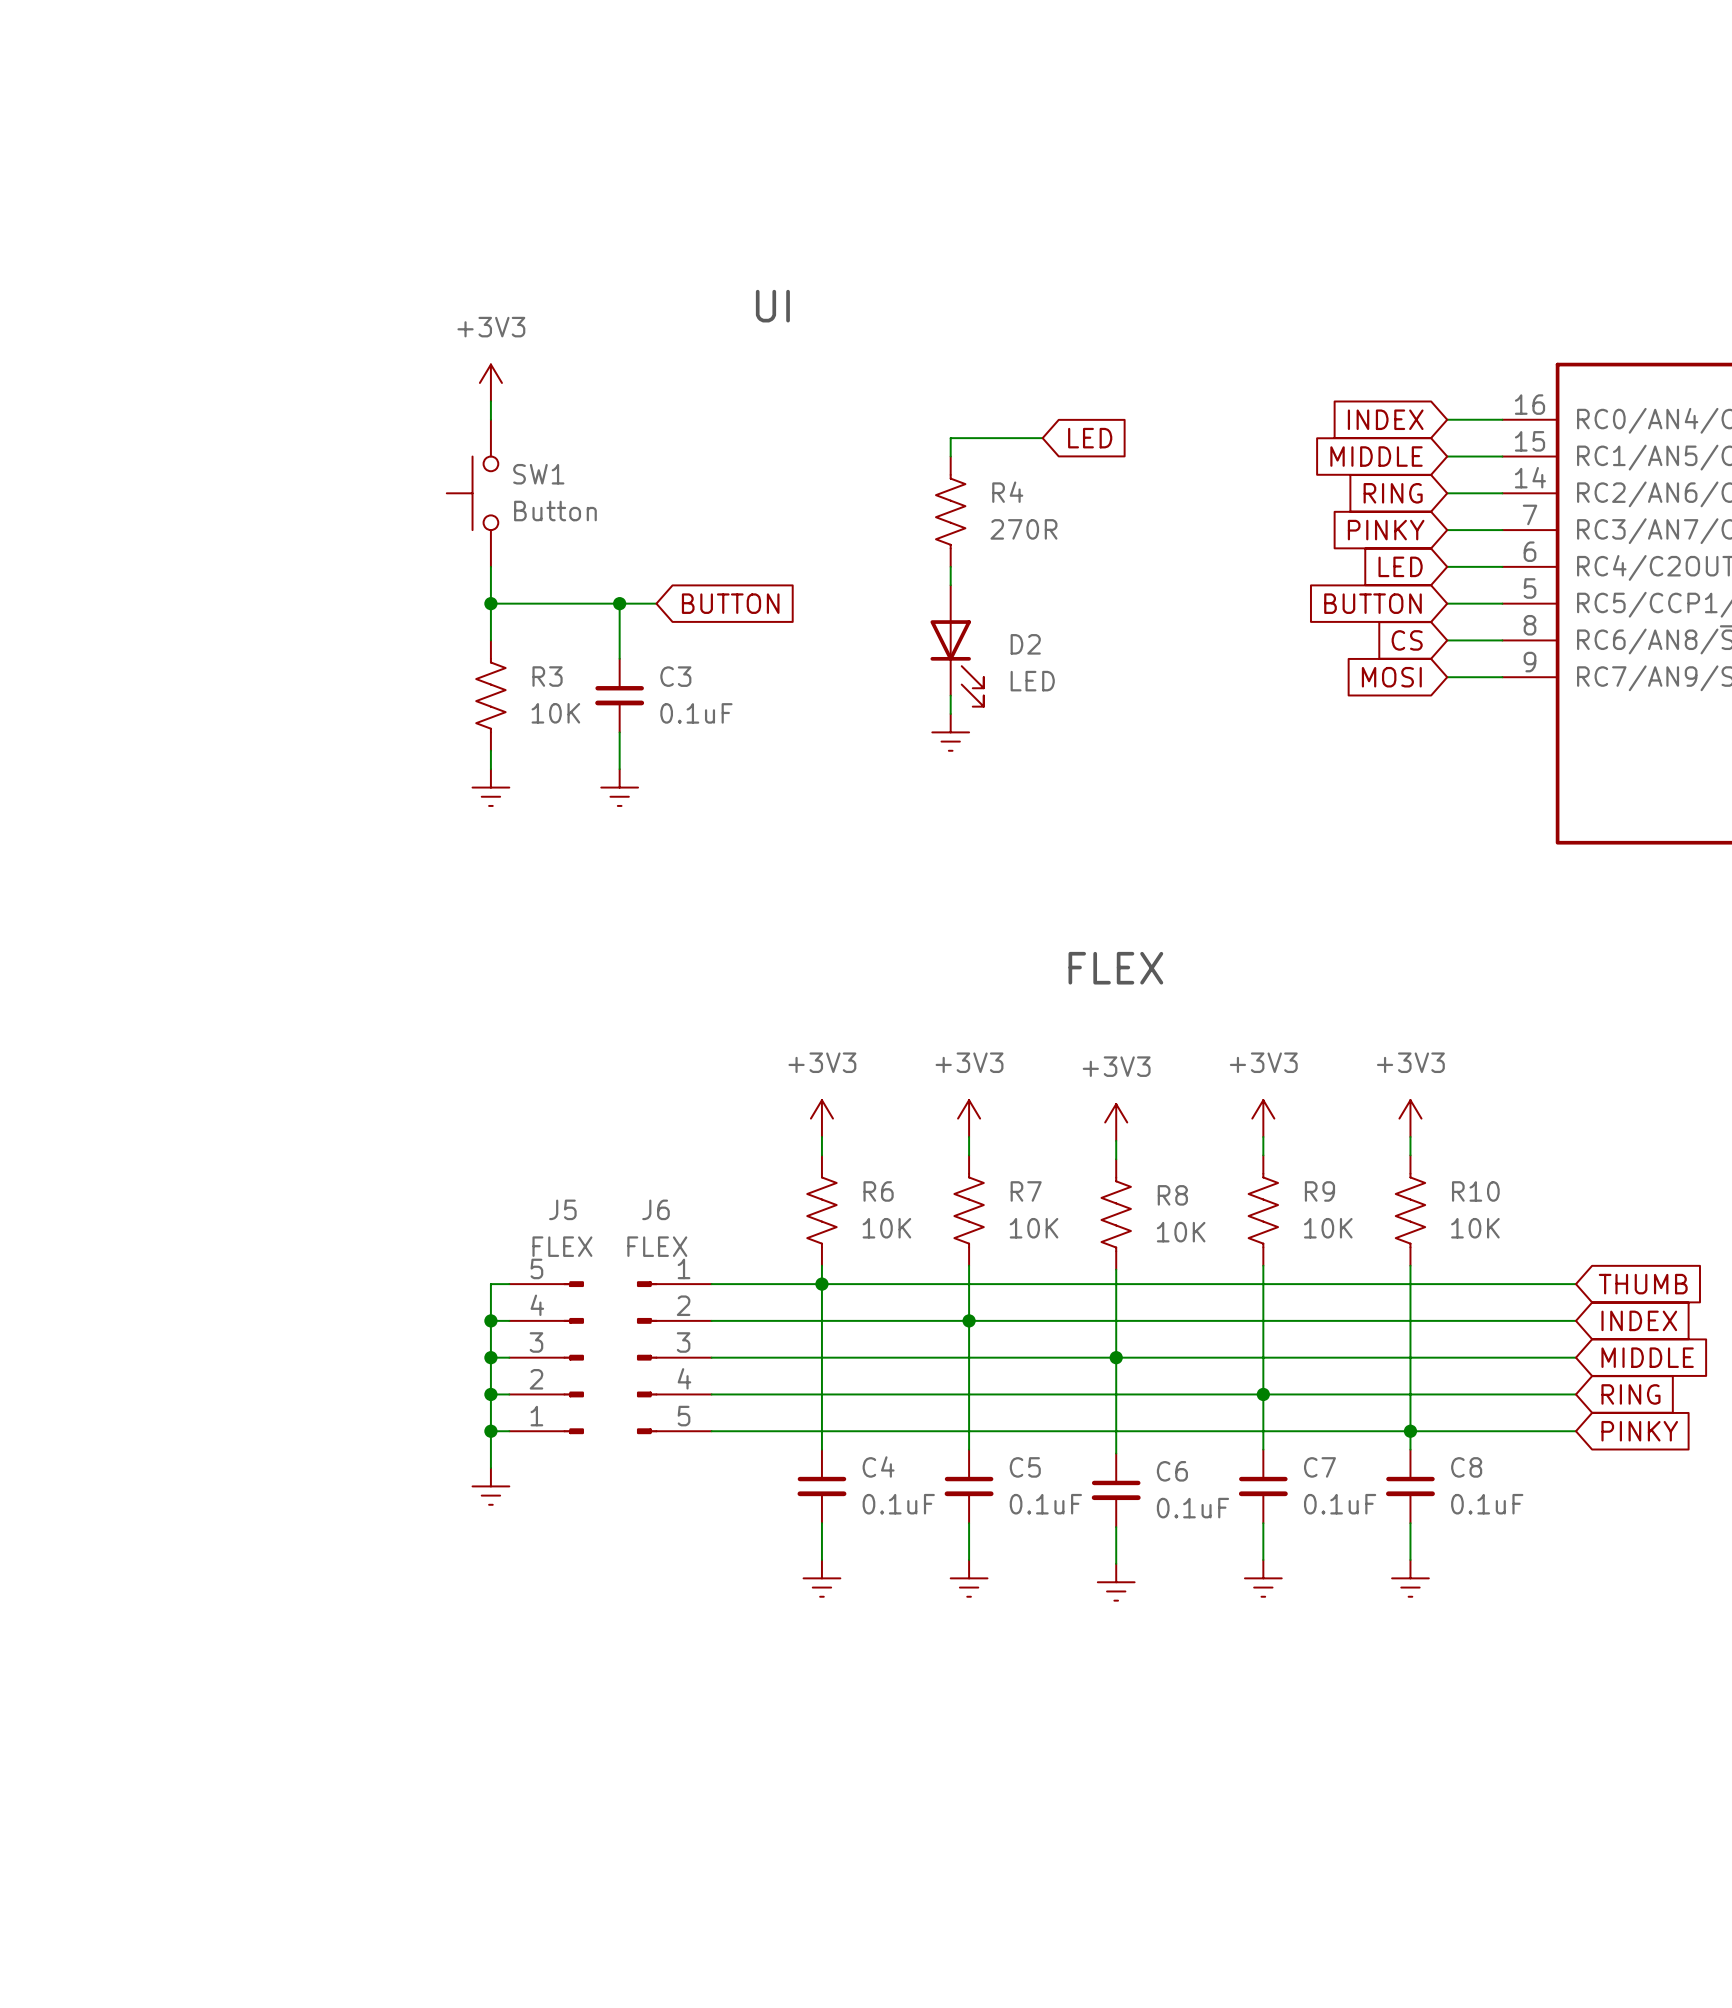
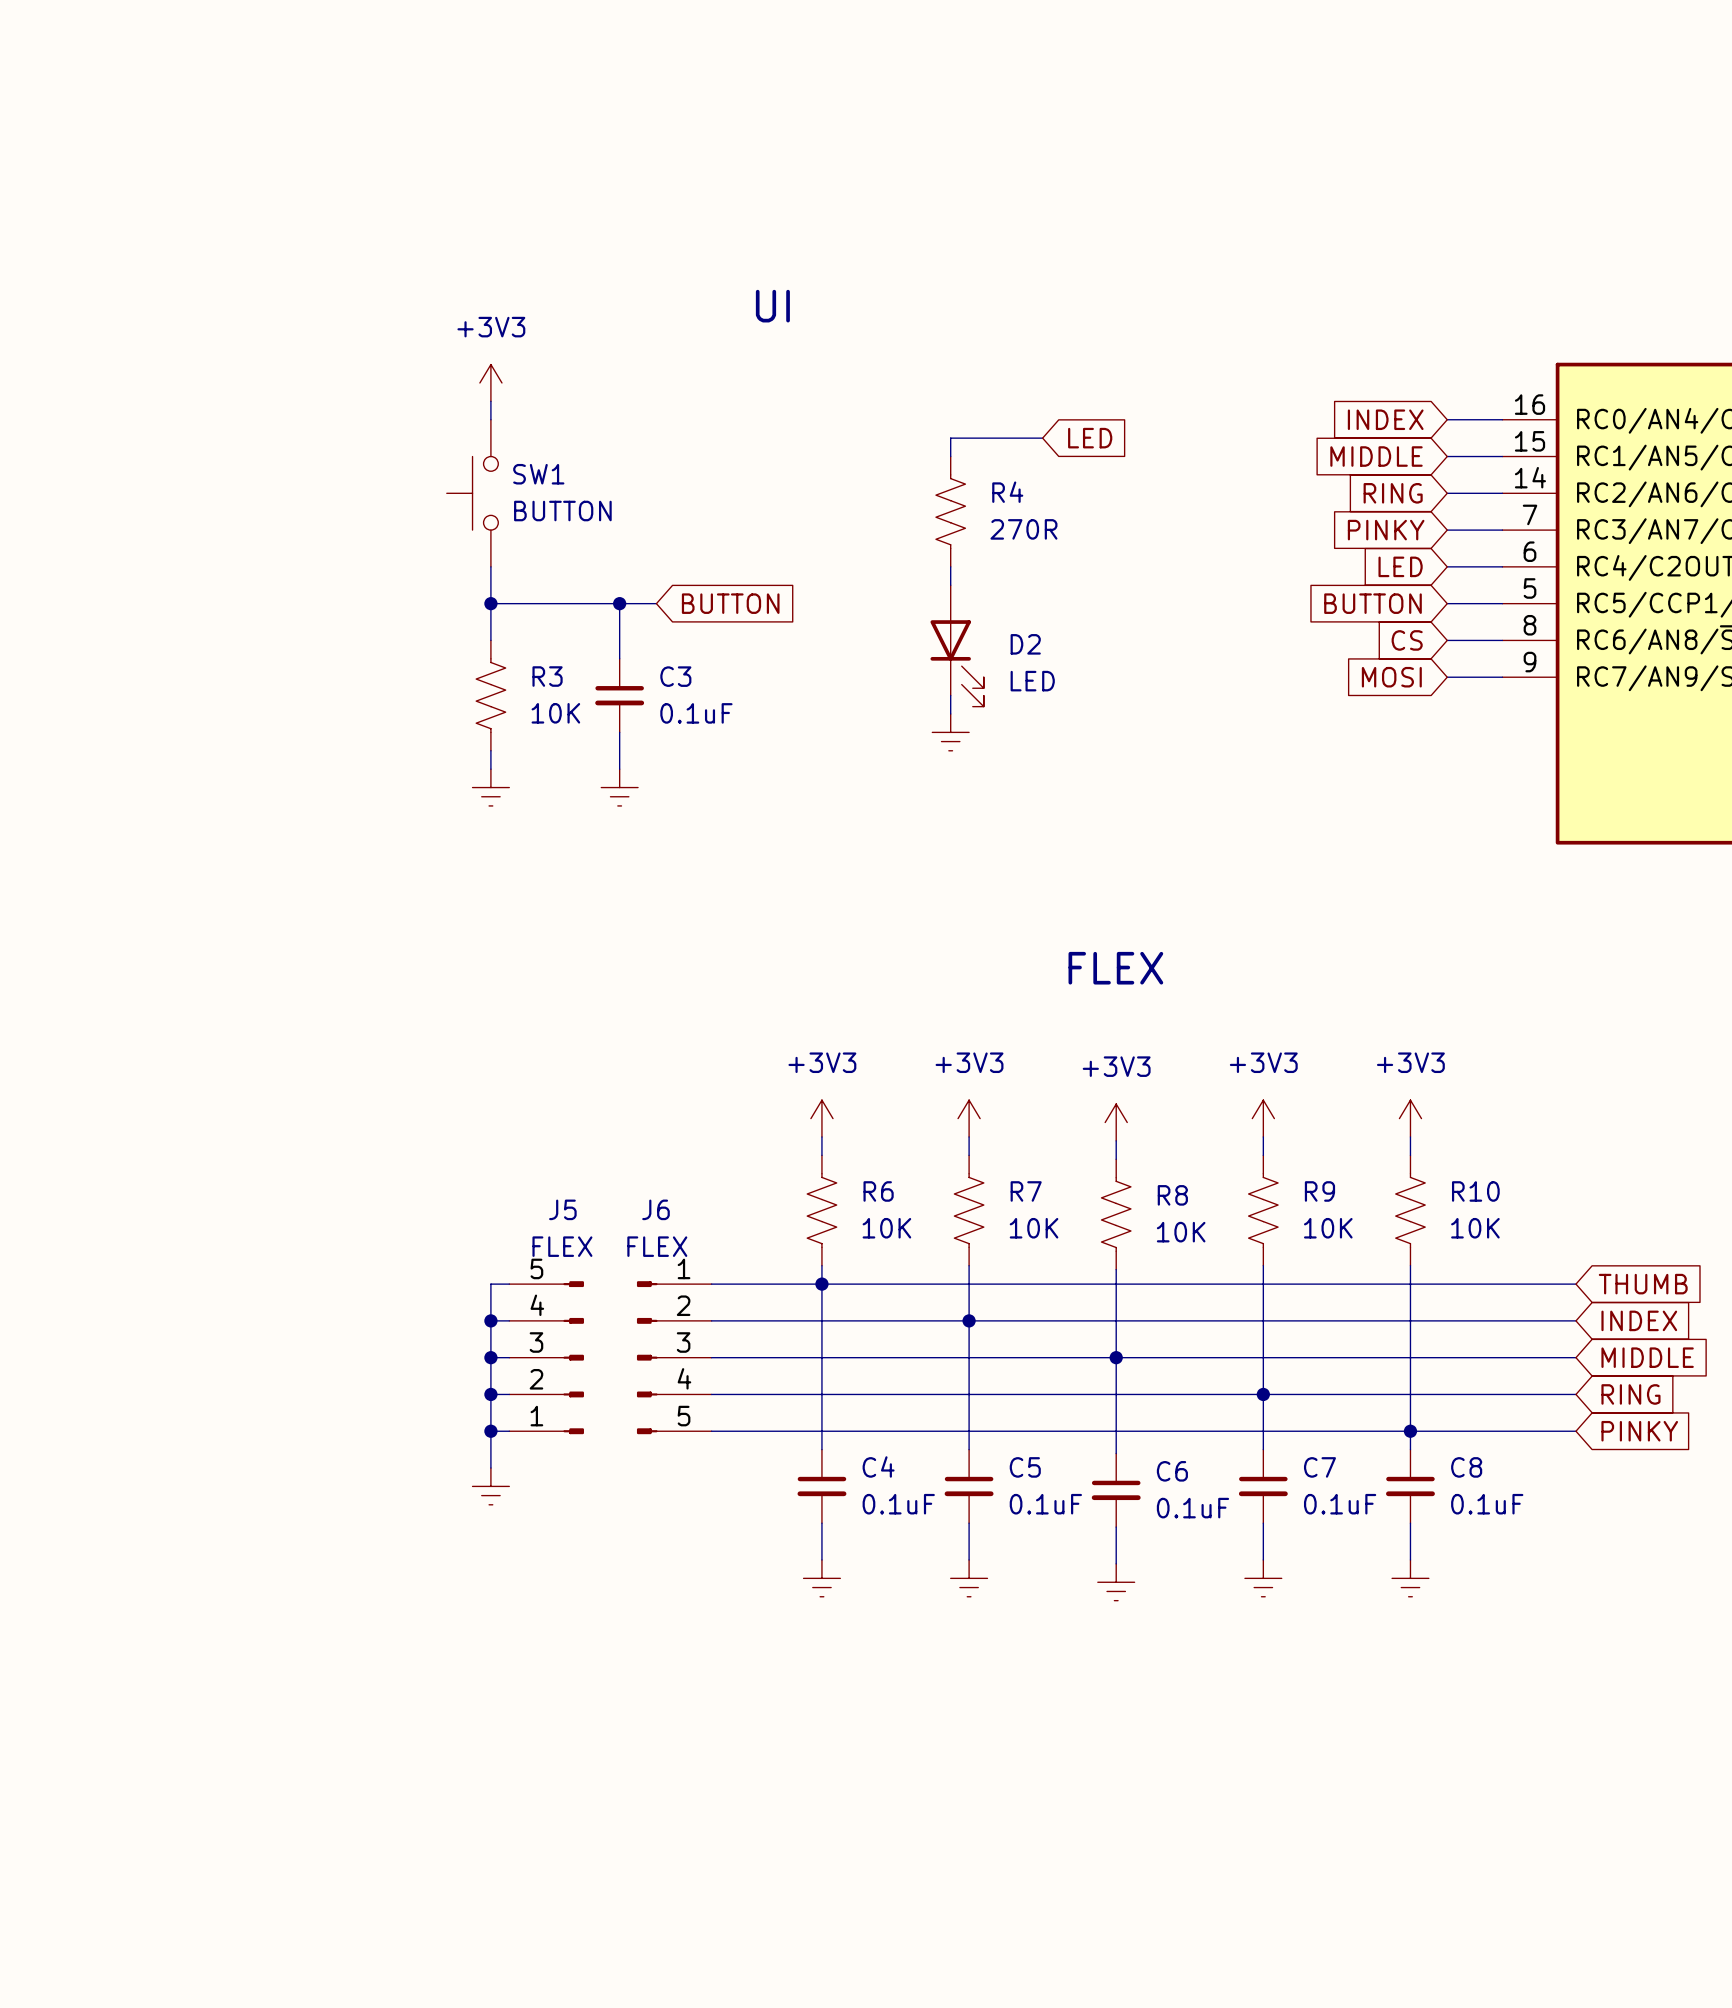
SW1 value: Button (555, 511) -> BUTTON (562, 511)

